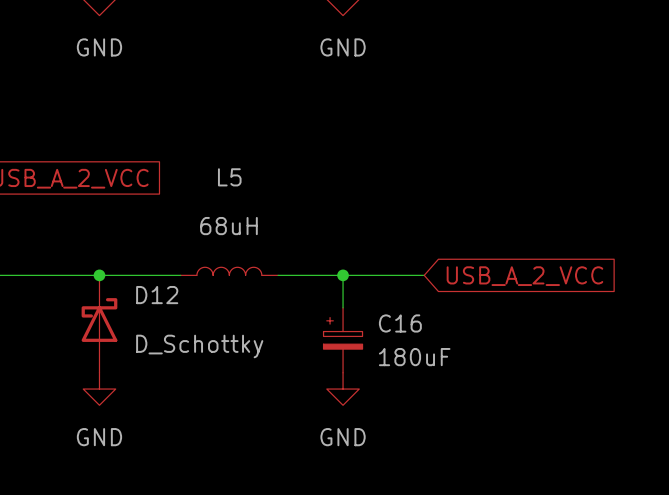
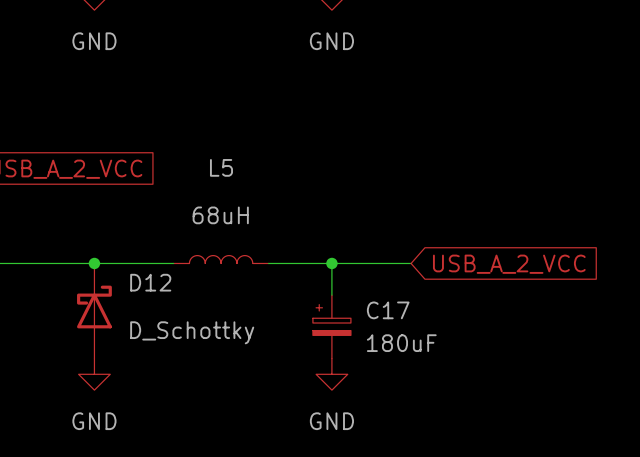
C16 name: C16 (400, 323) -> C17 (388, 310)

